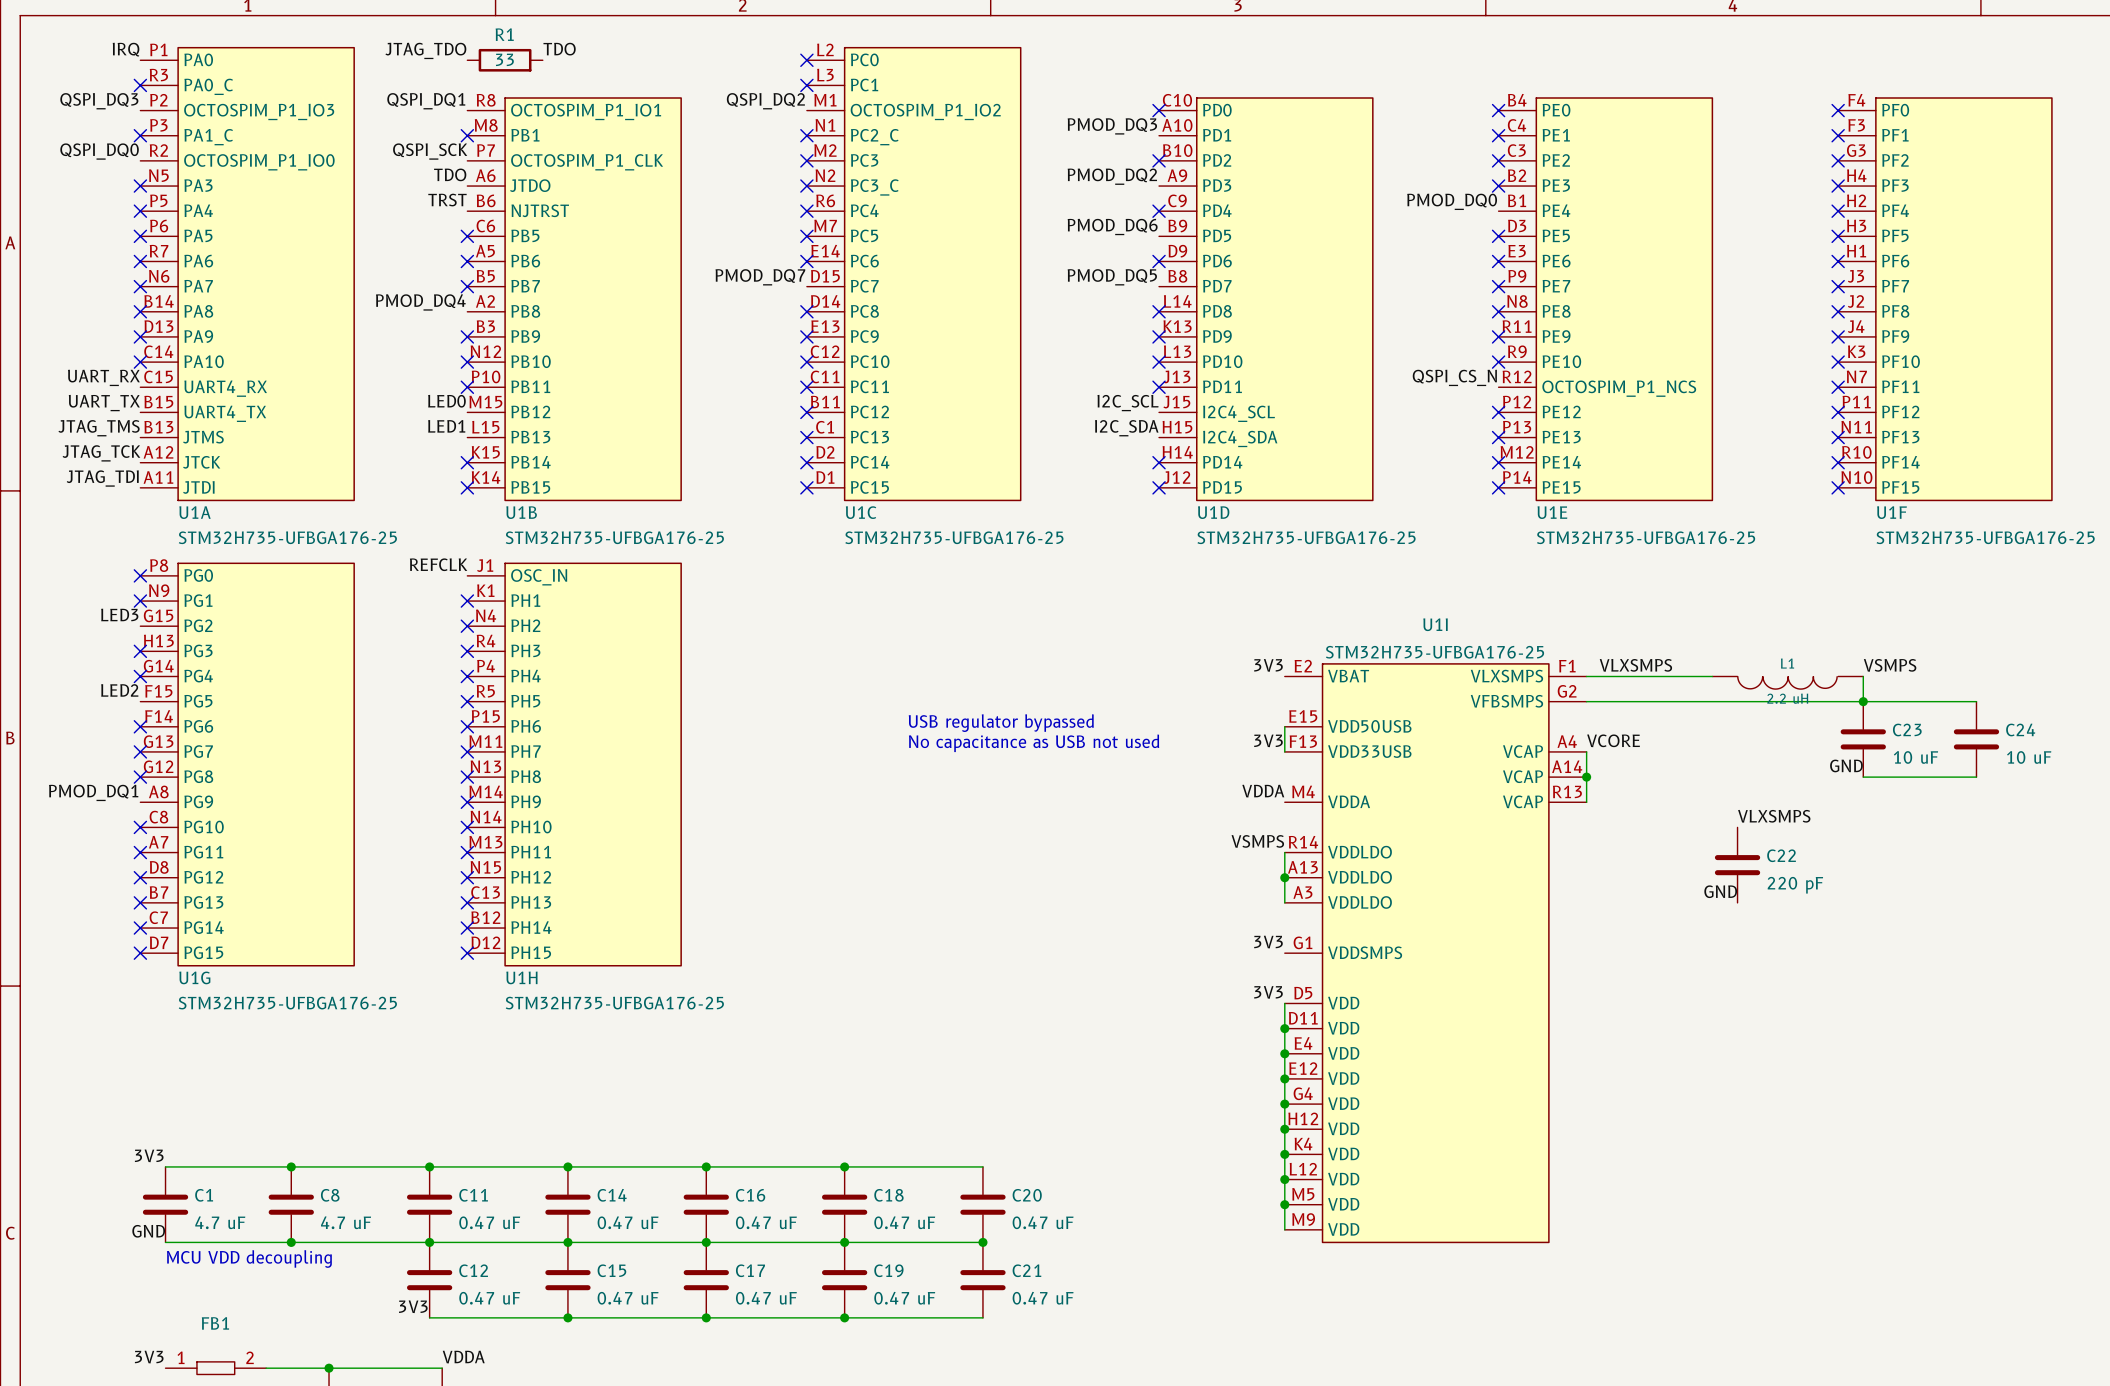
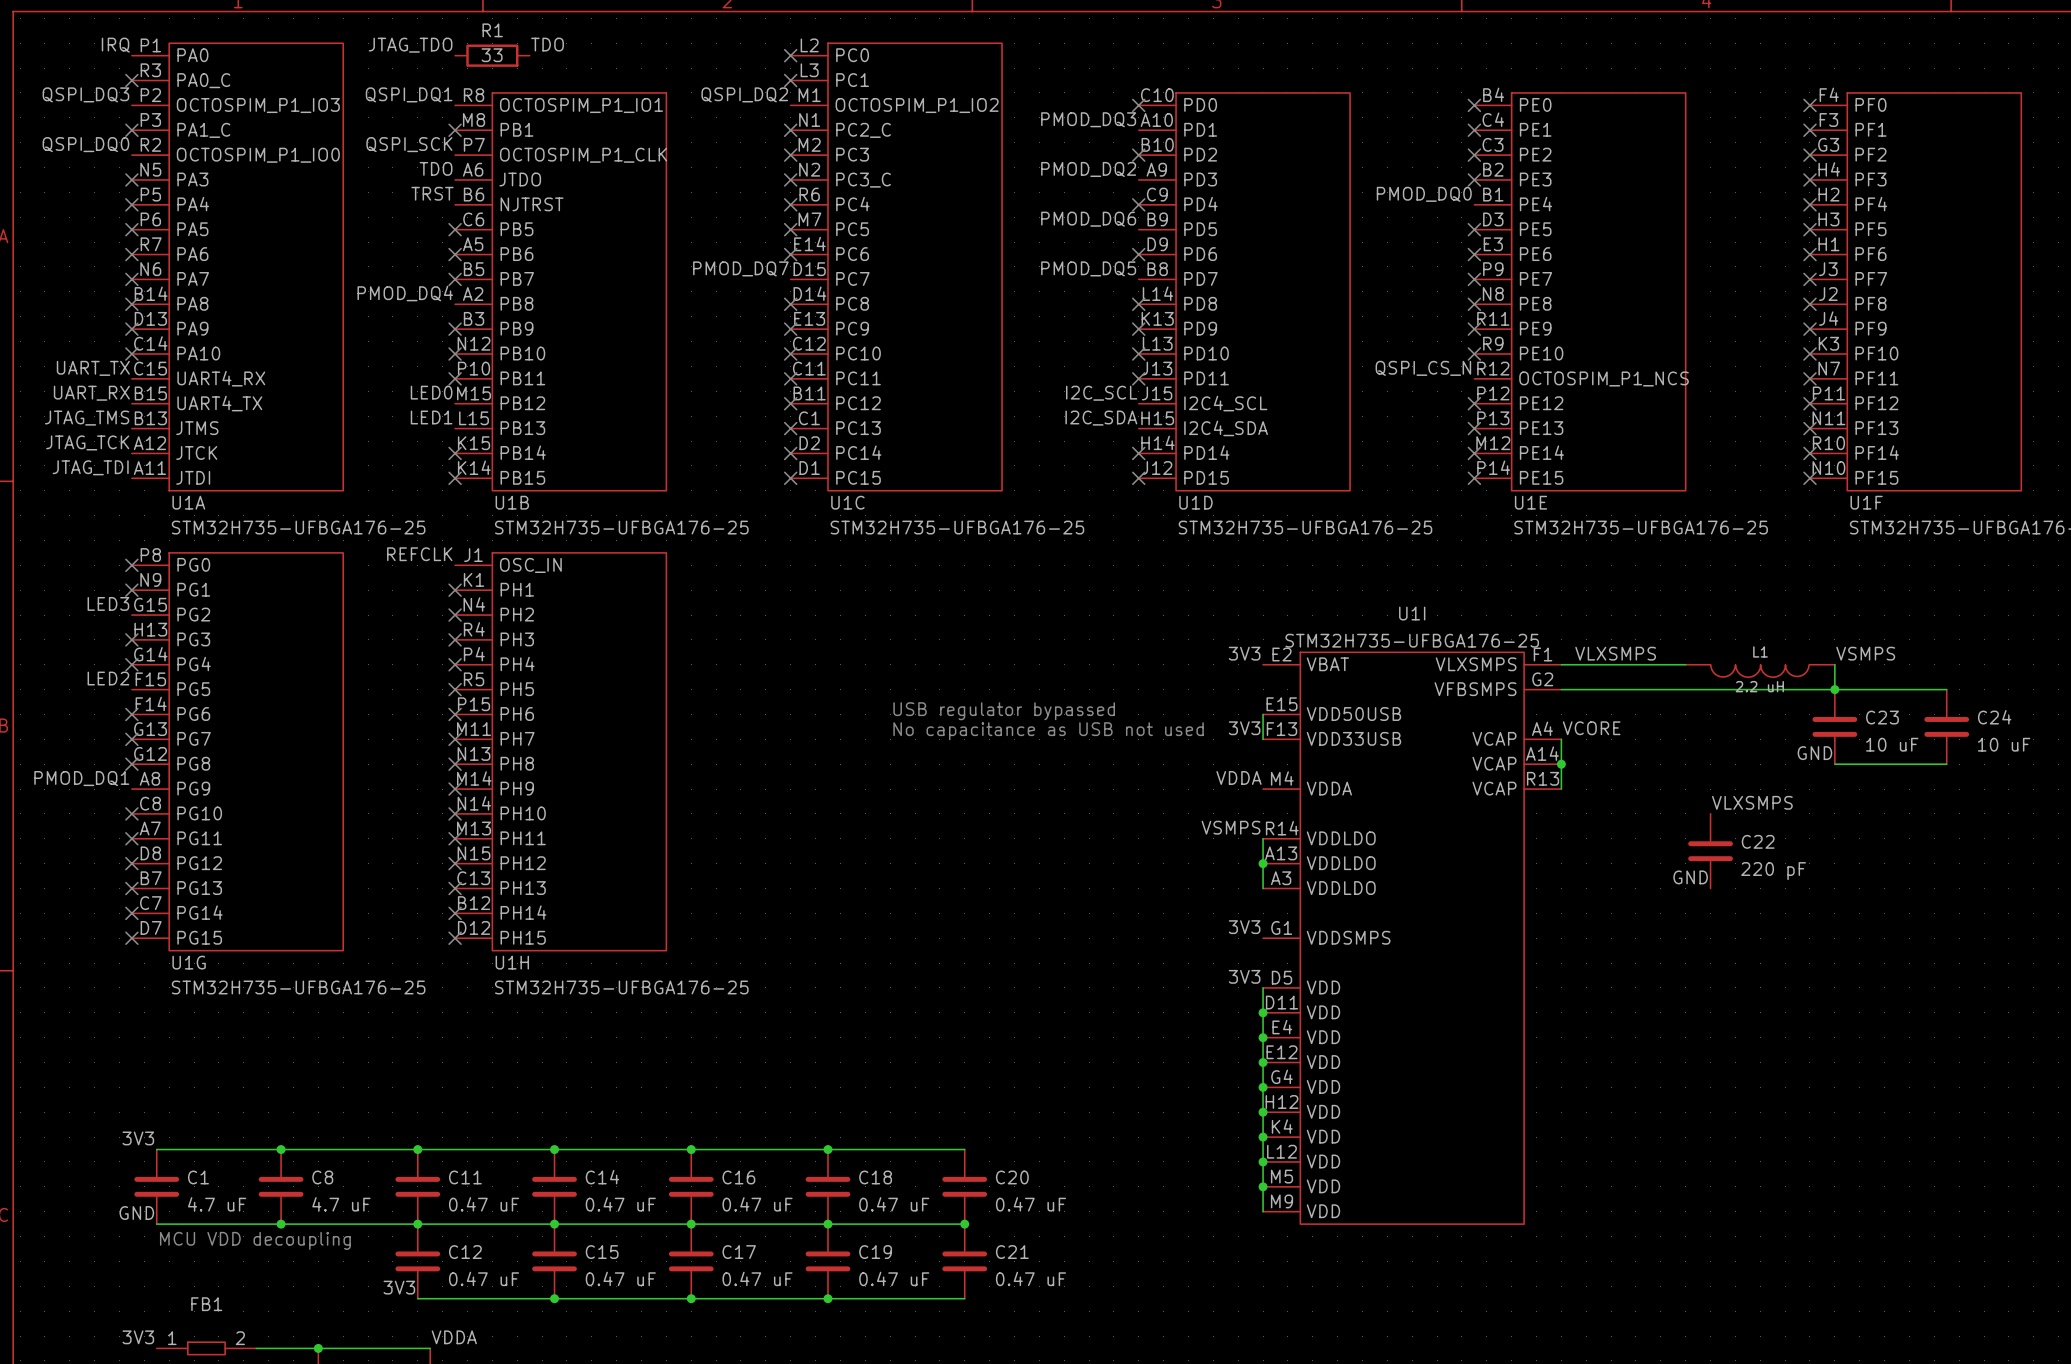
label: UART_RX (103, 377) -> UART_TX (93, 368)
label: UART_TX (104, 403) -> UART_RX (91, 393)

